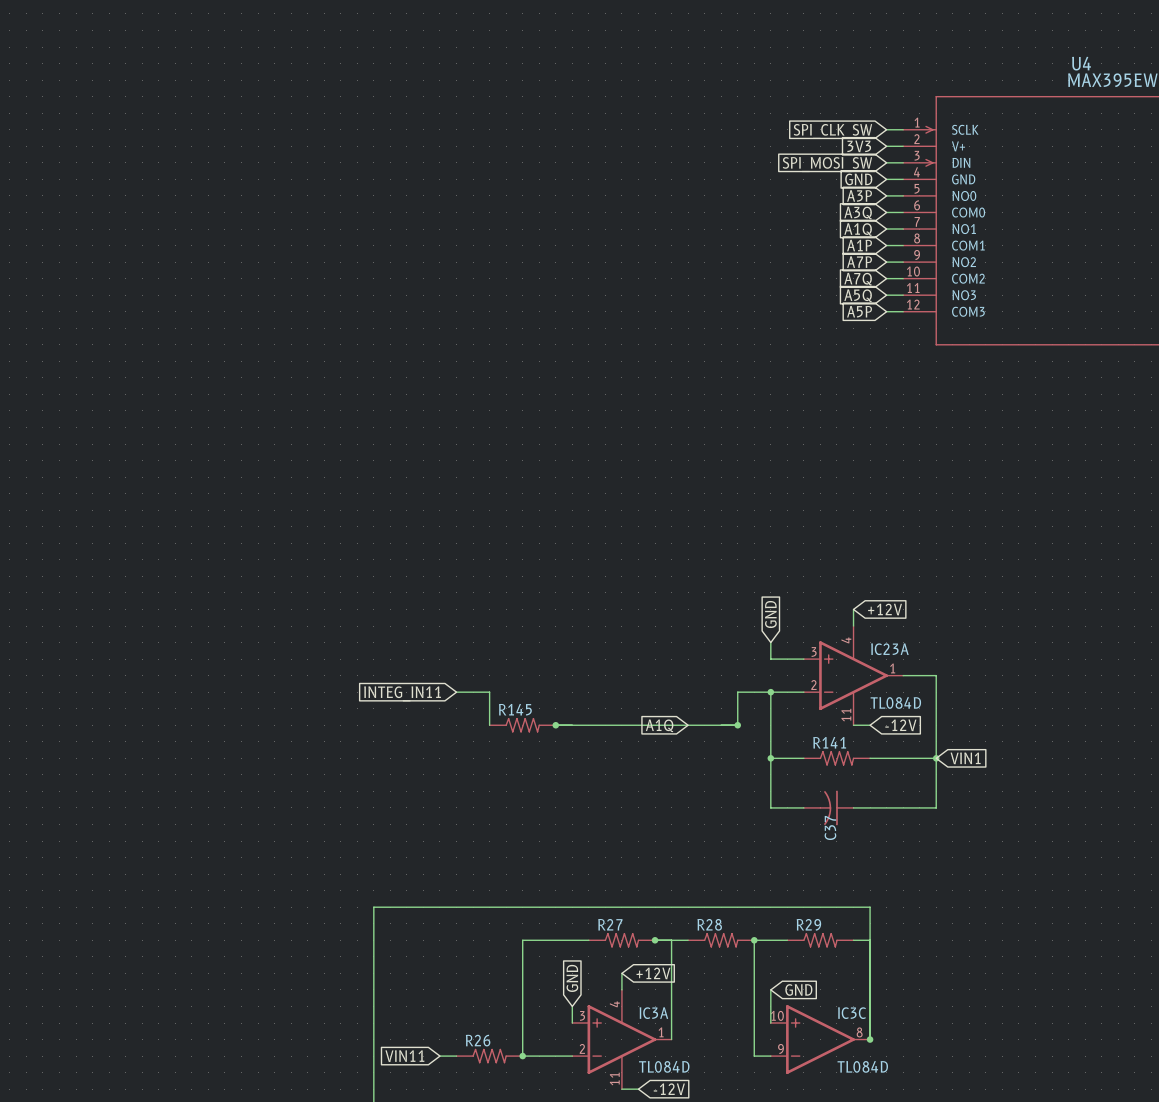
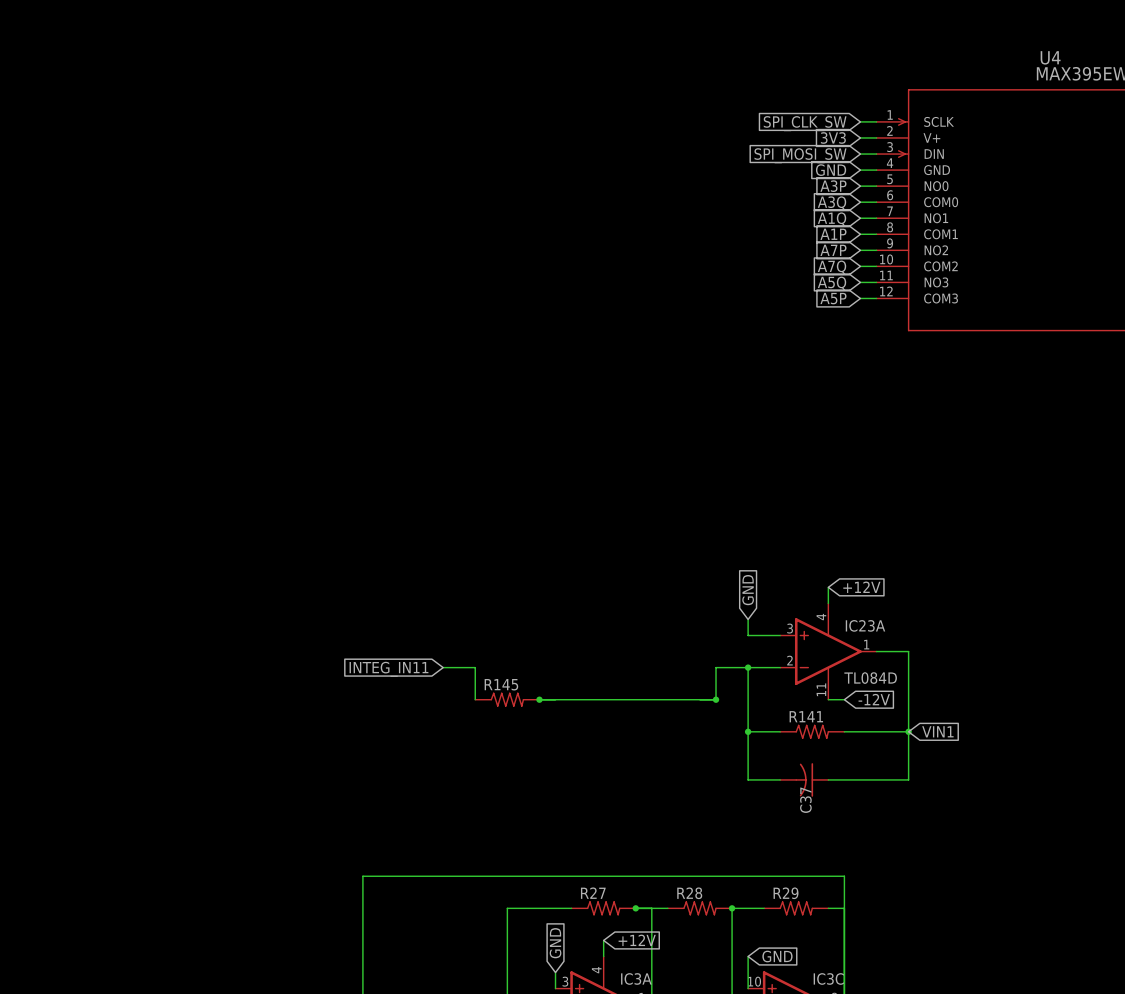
global label: A1Q (659, 725) -> none

